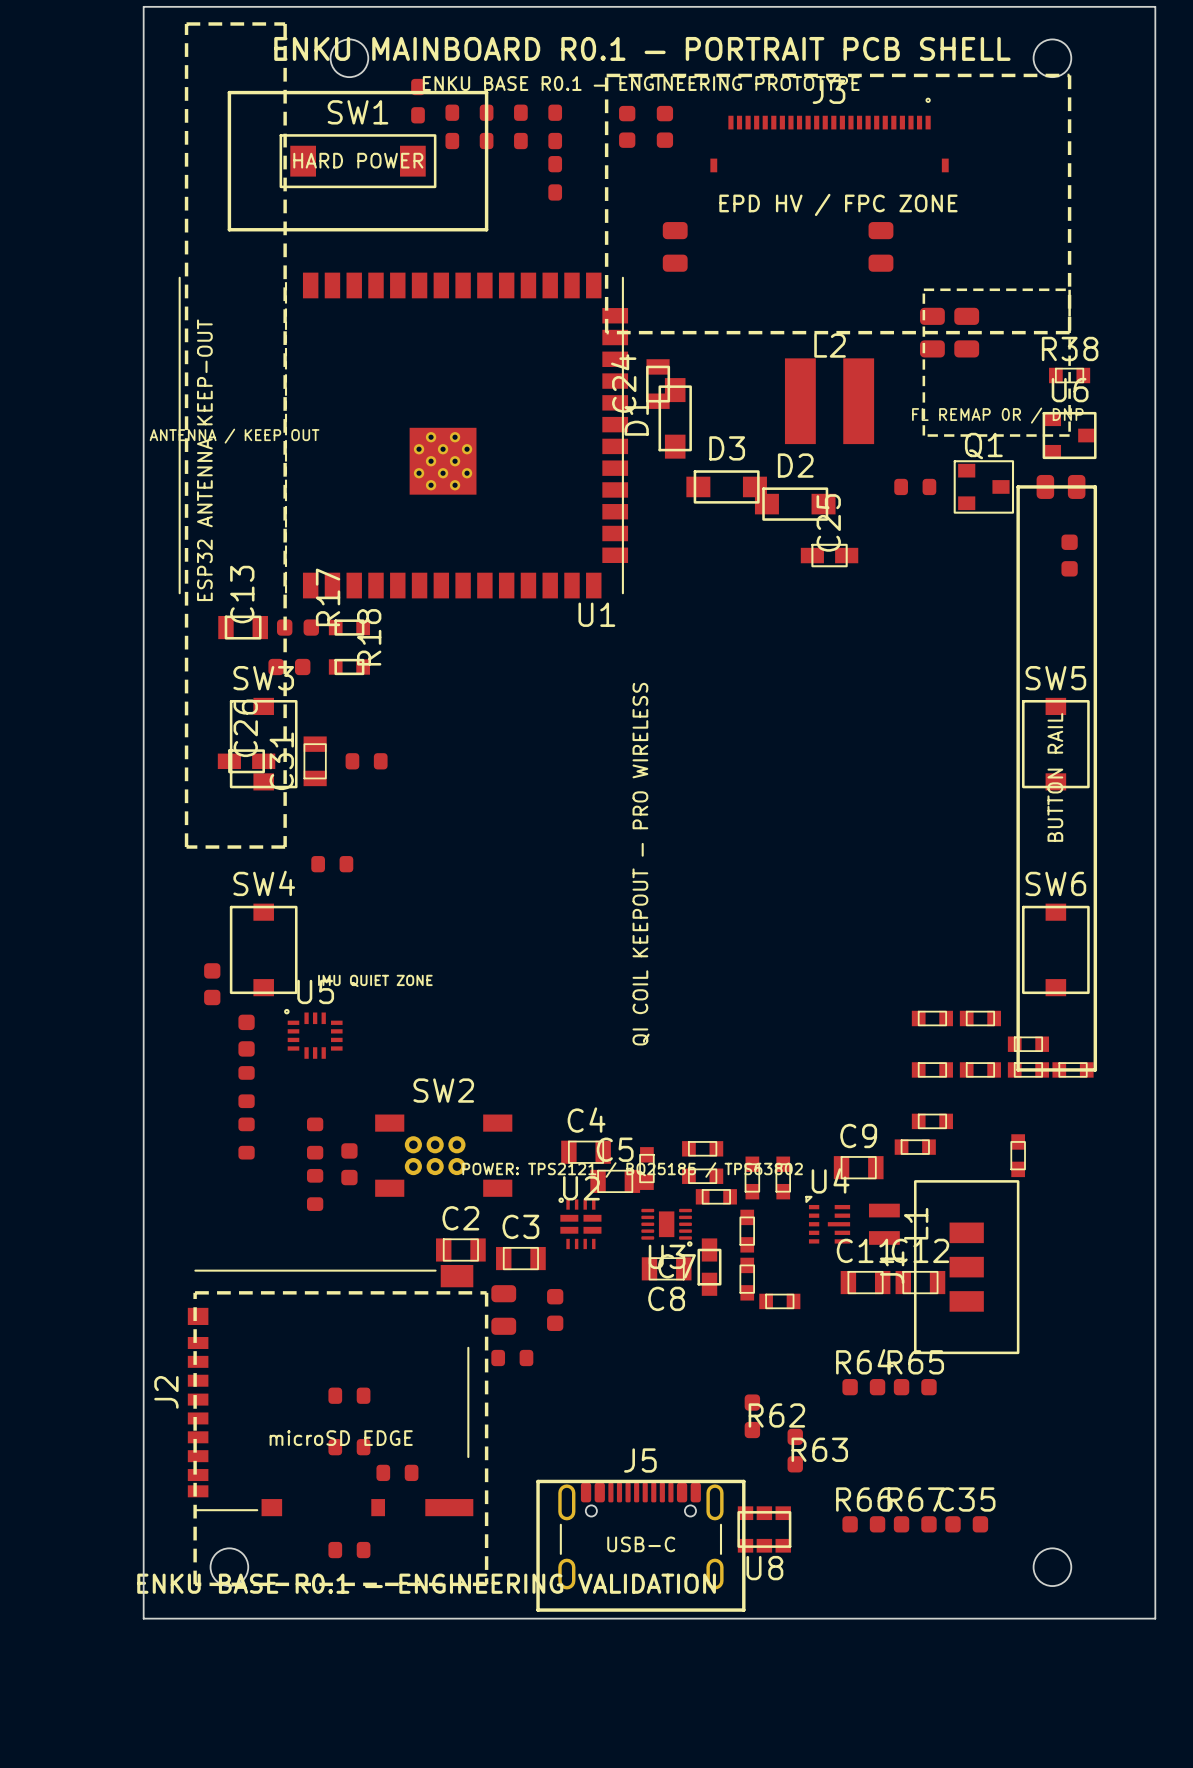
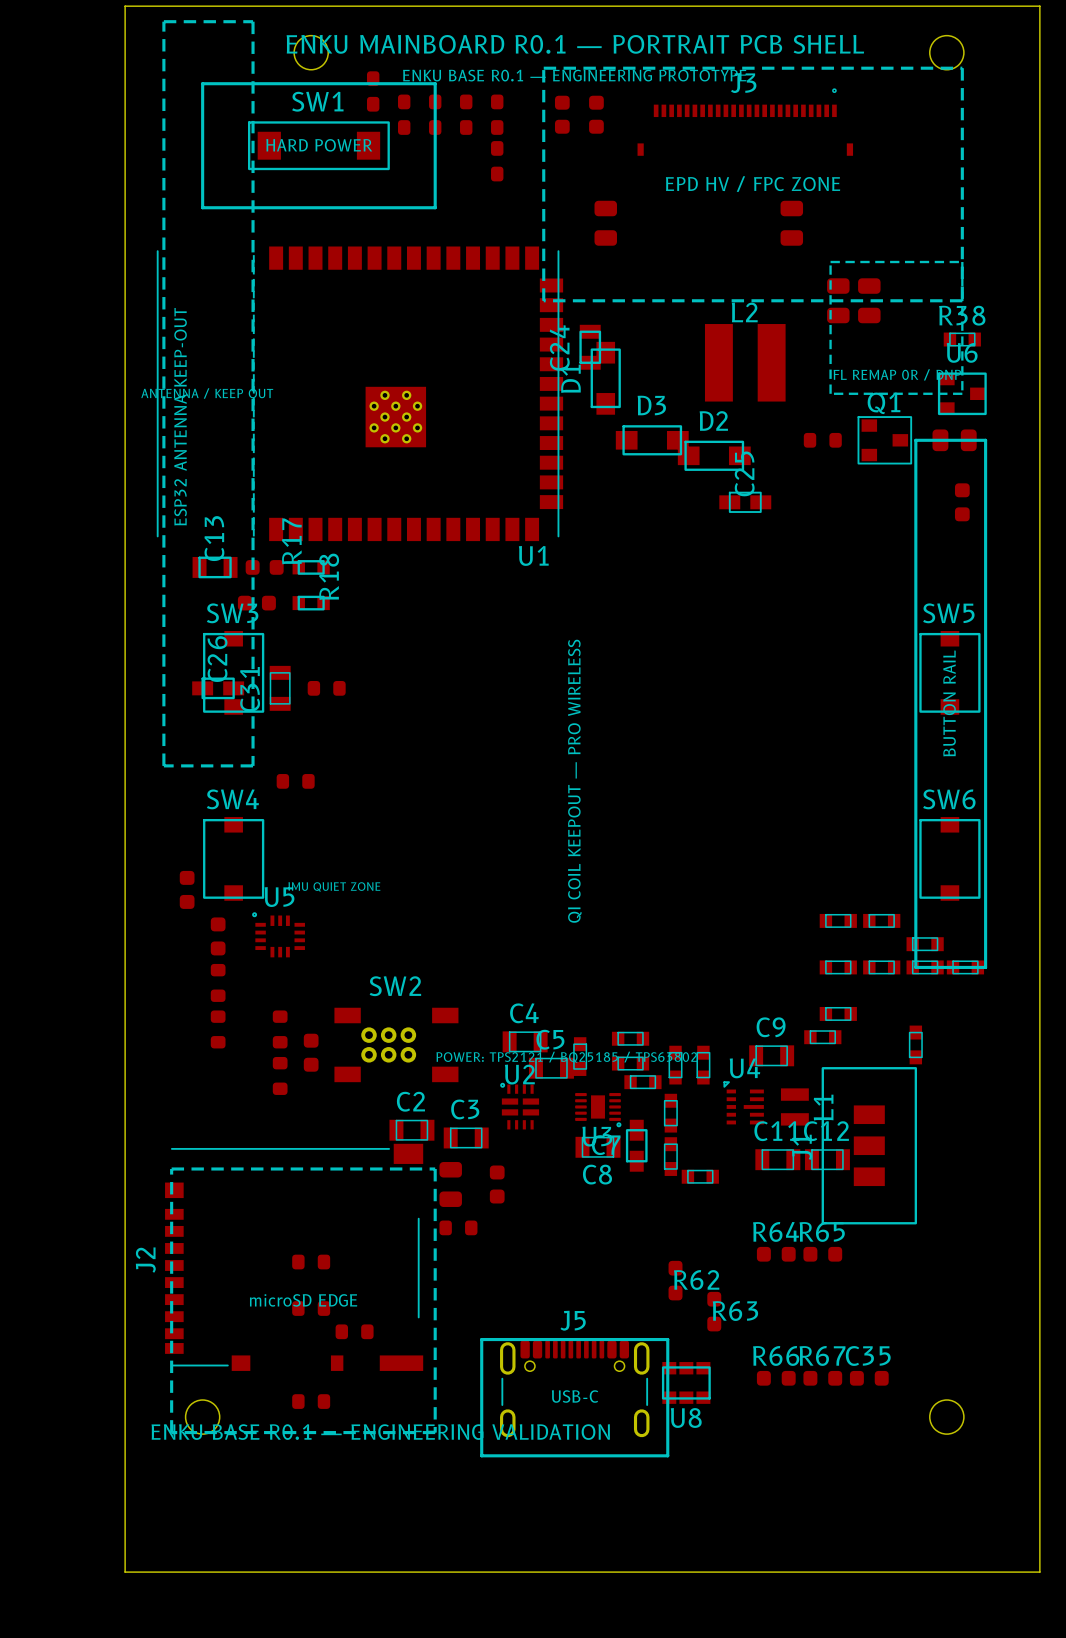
board edge: (143, 1618) (1155, 1618) -> (125, 1463) (125, 1572) (1039, 1572) (1039, 1463)

